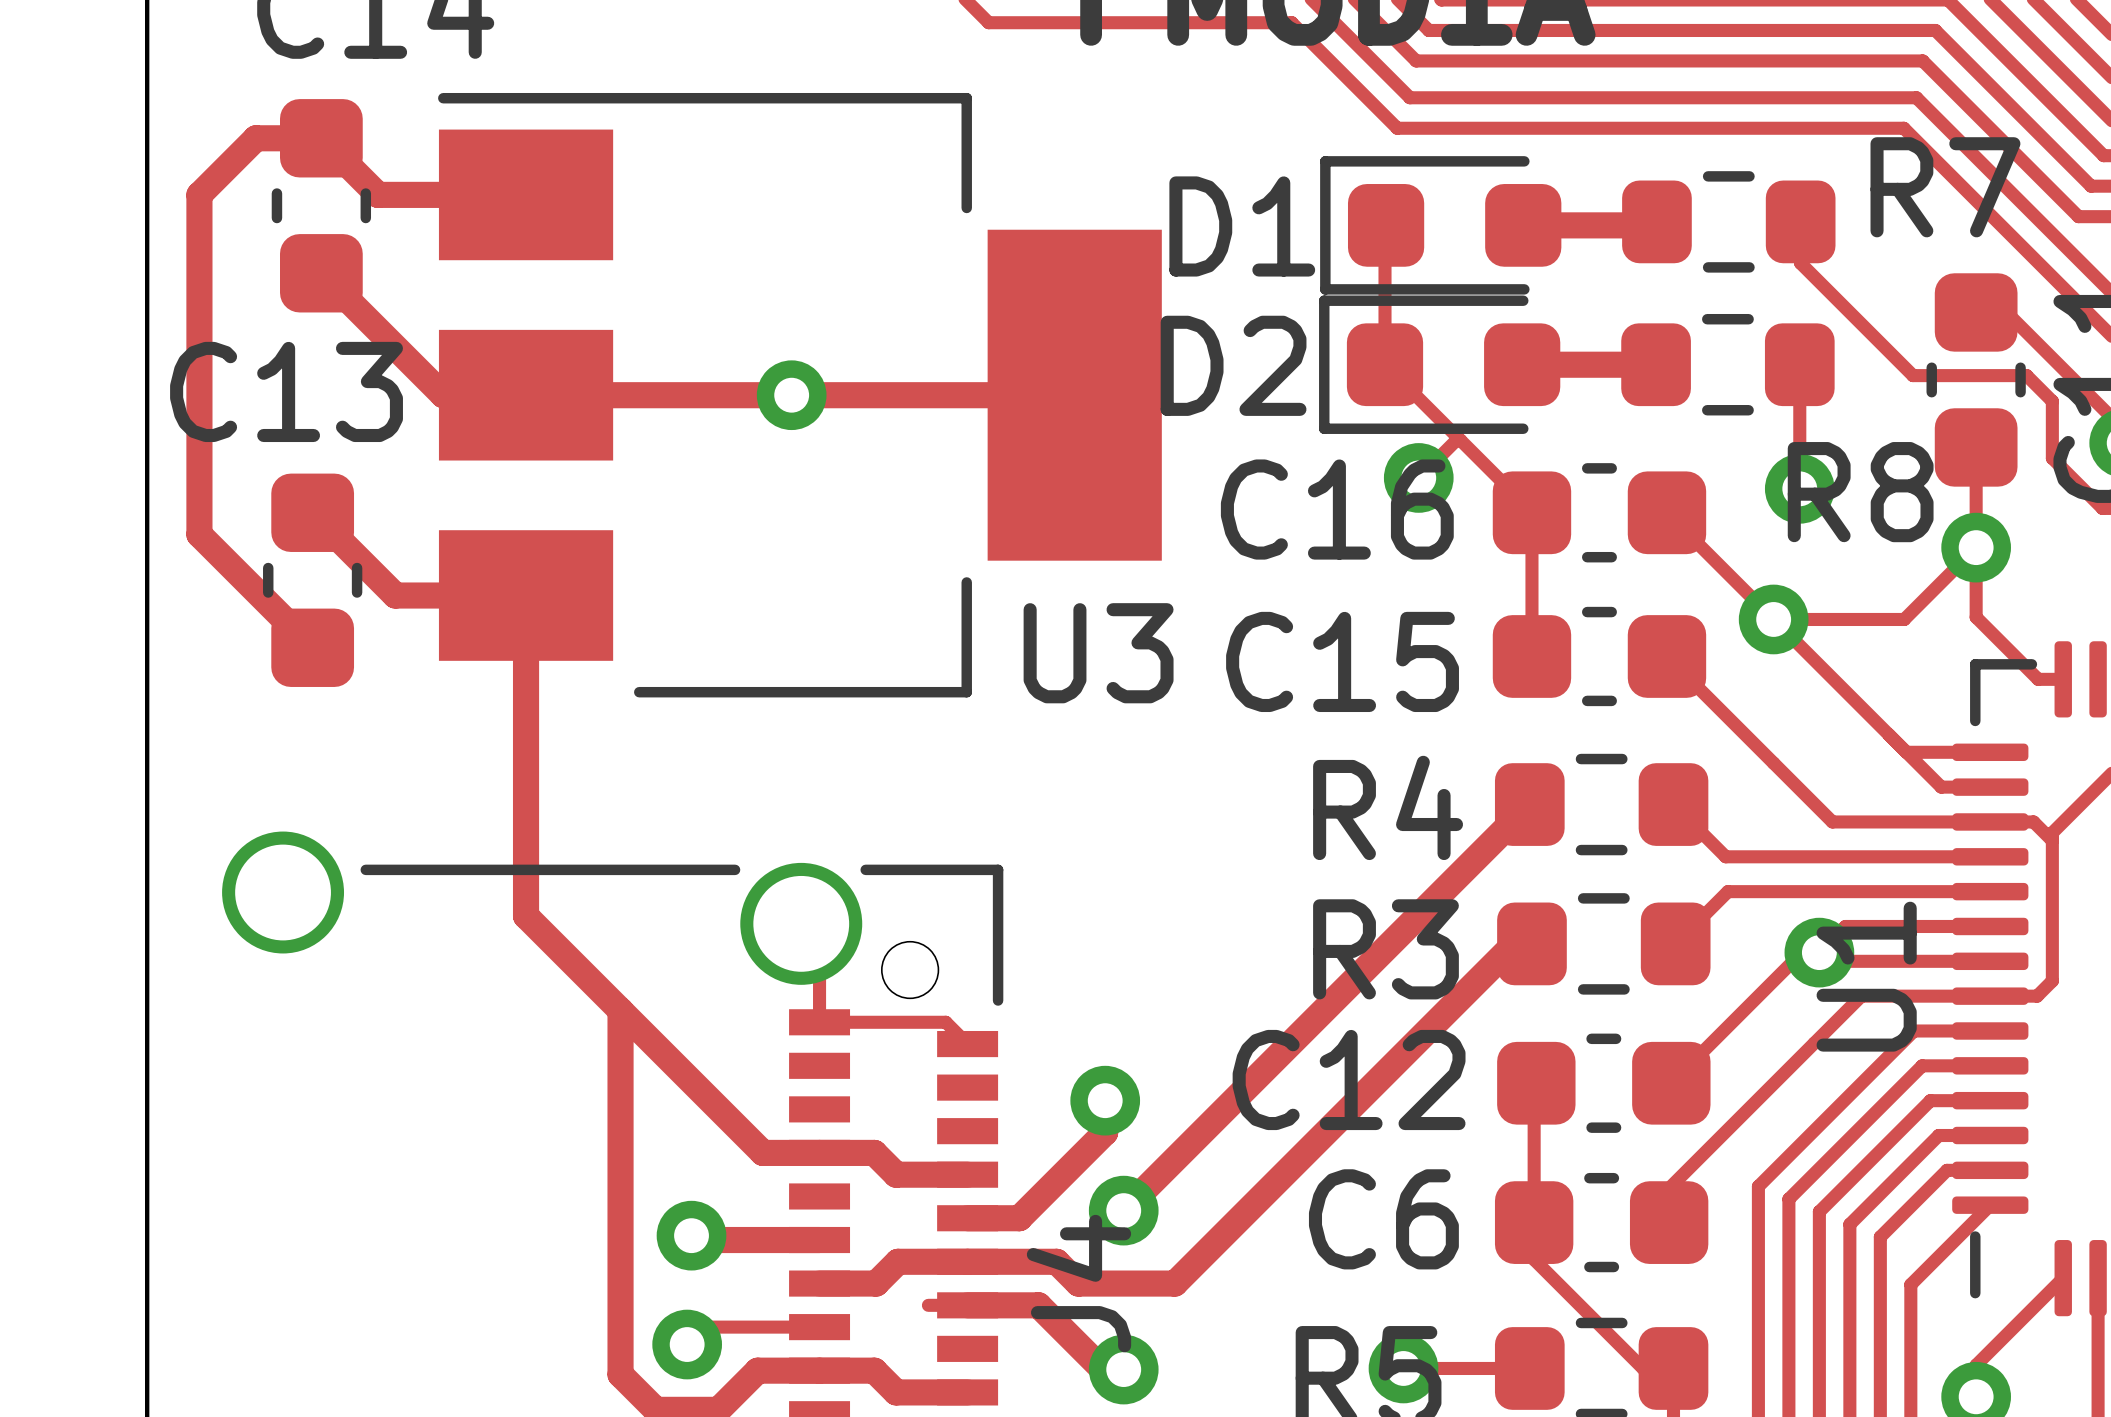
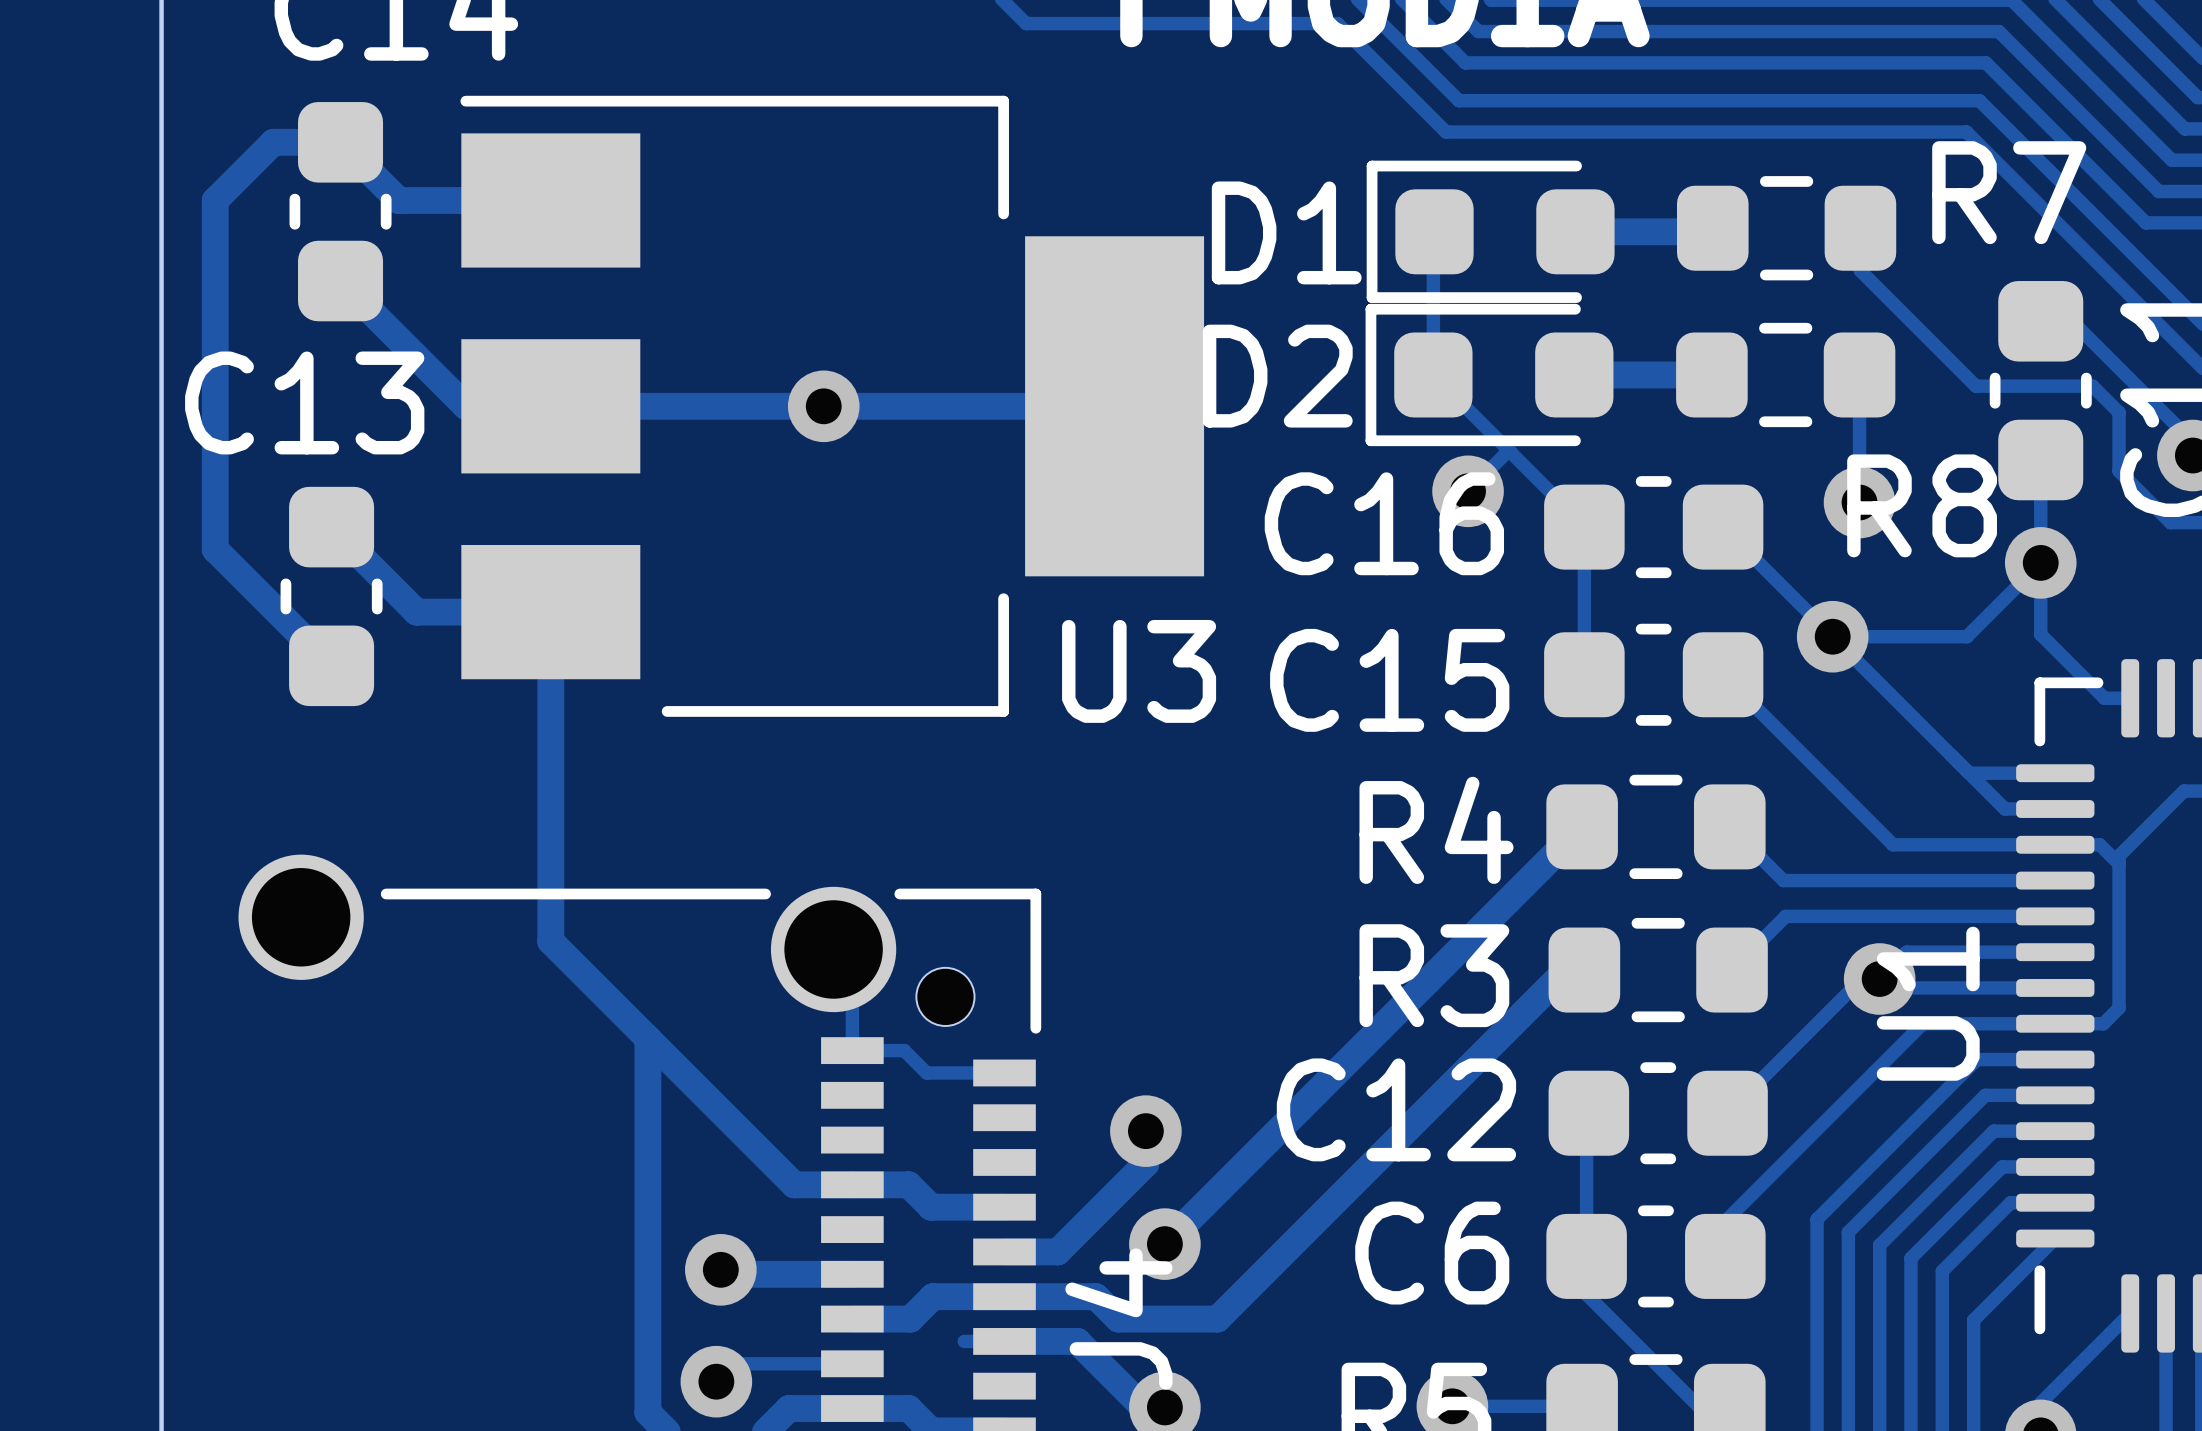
track: (870, 1022) (945, 1022) (967, 1044) -> (904, 1050) (926, 1072) (1004, 1072)

